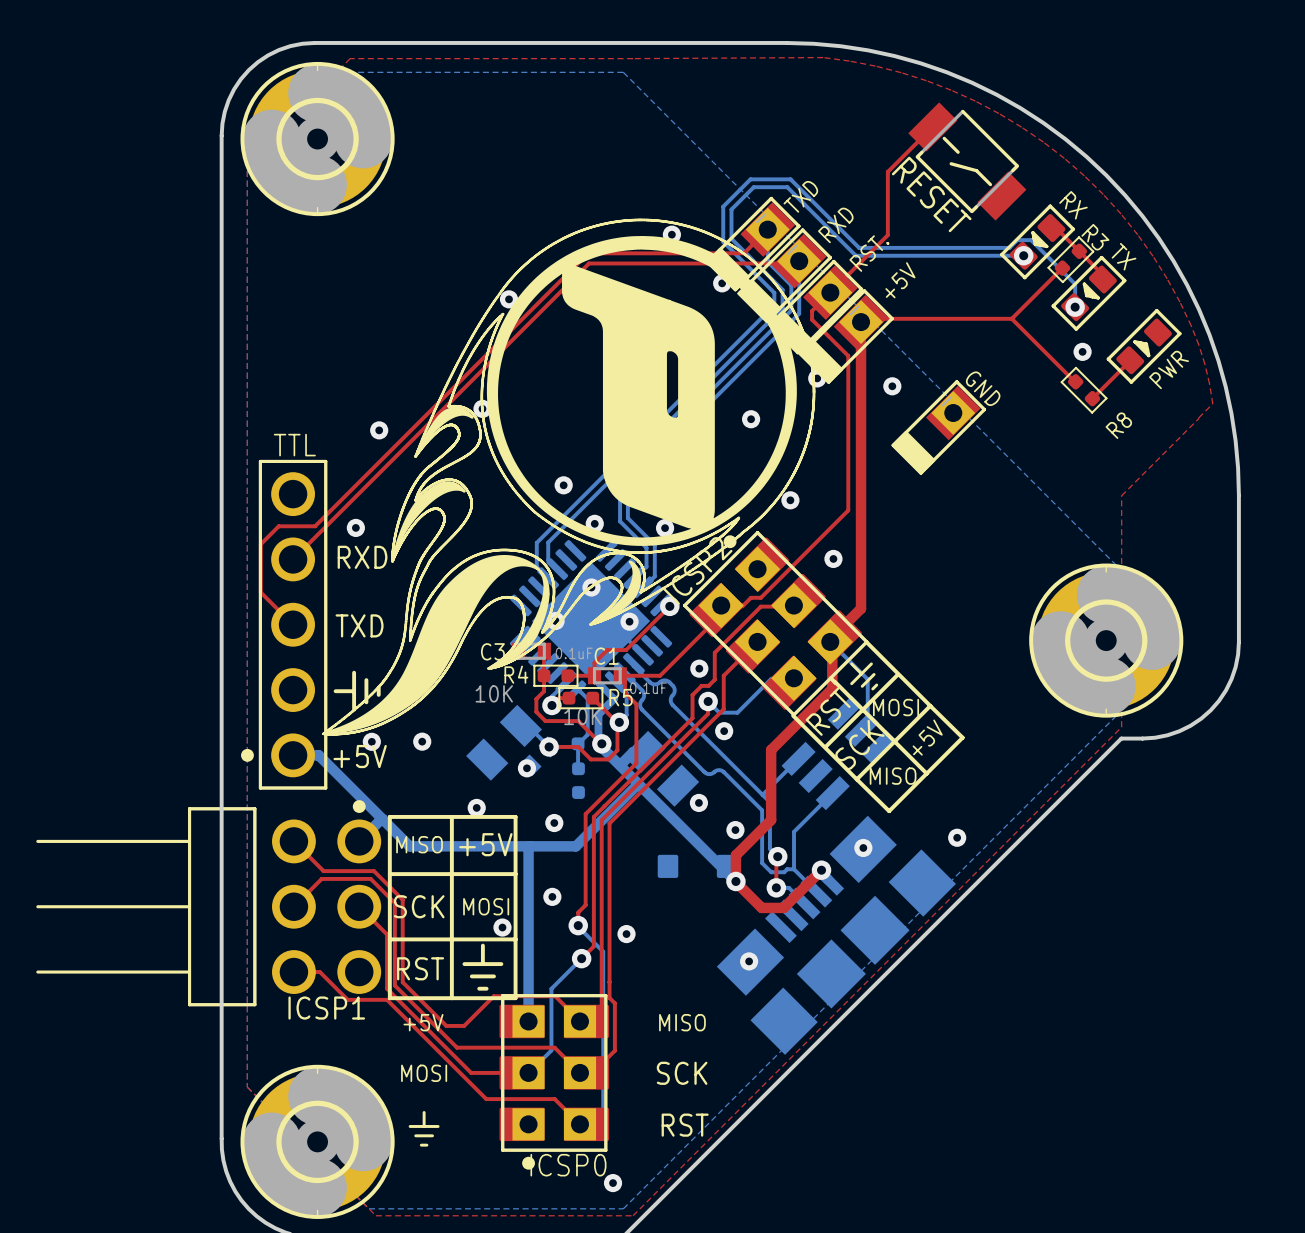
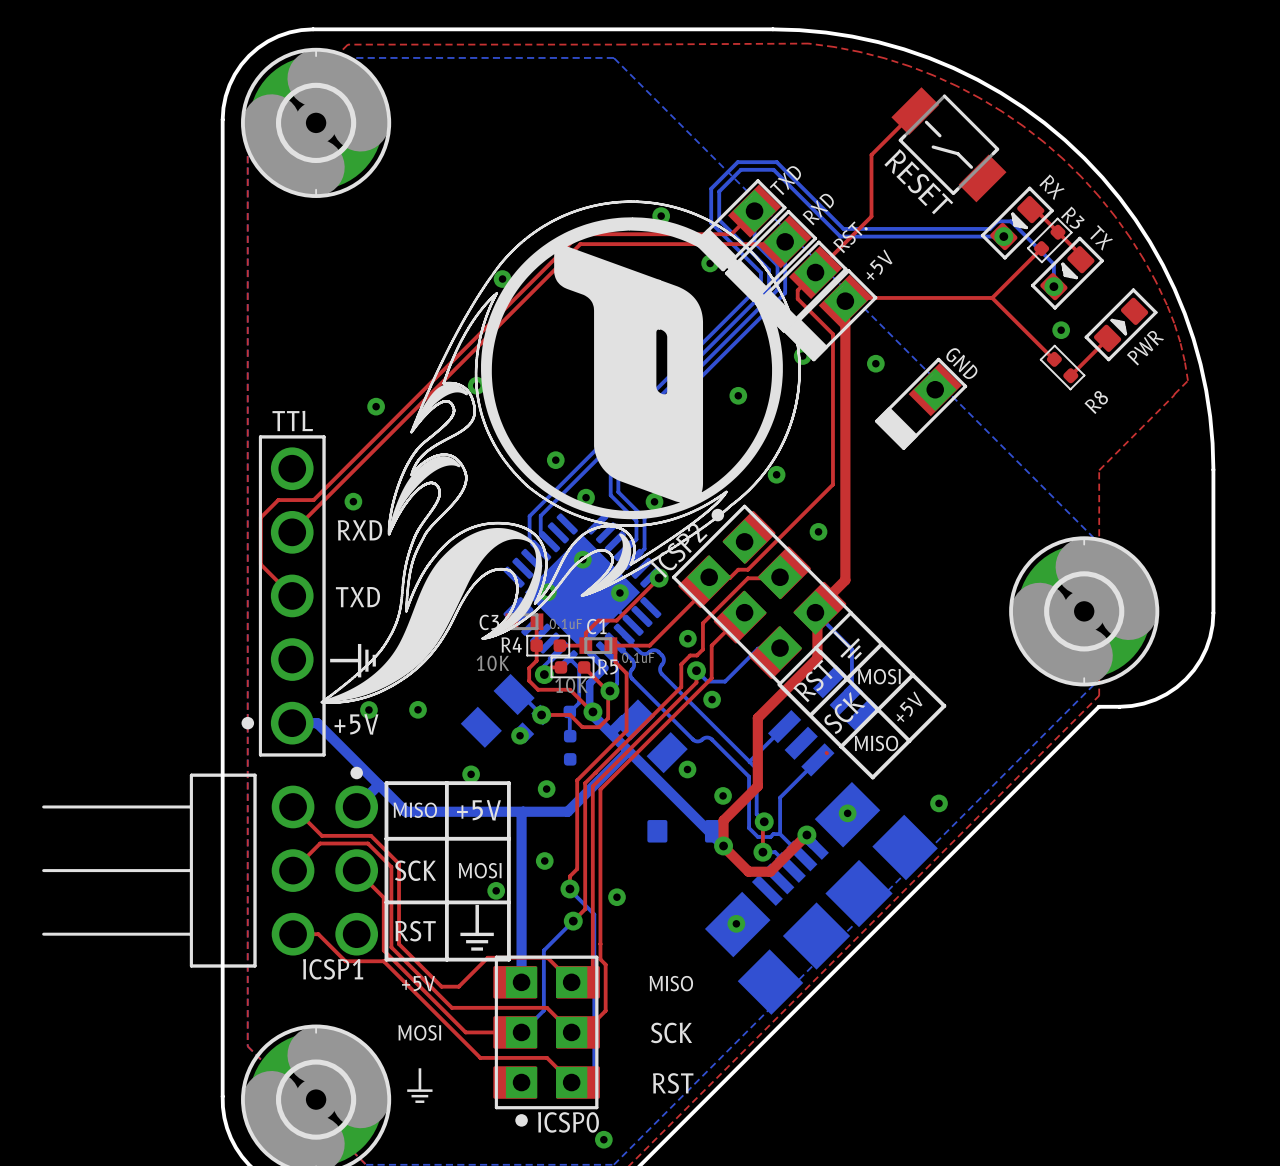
top track: none -> (826, 752) (826, 753)

